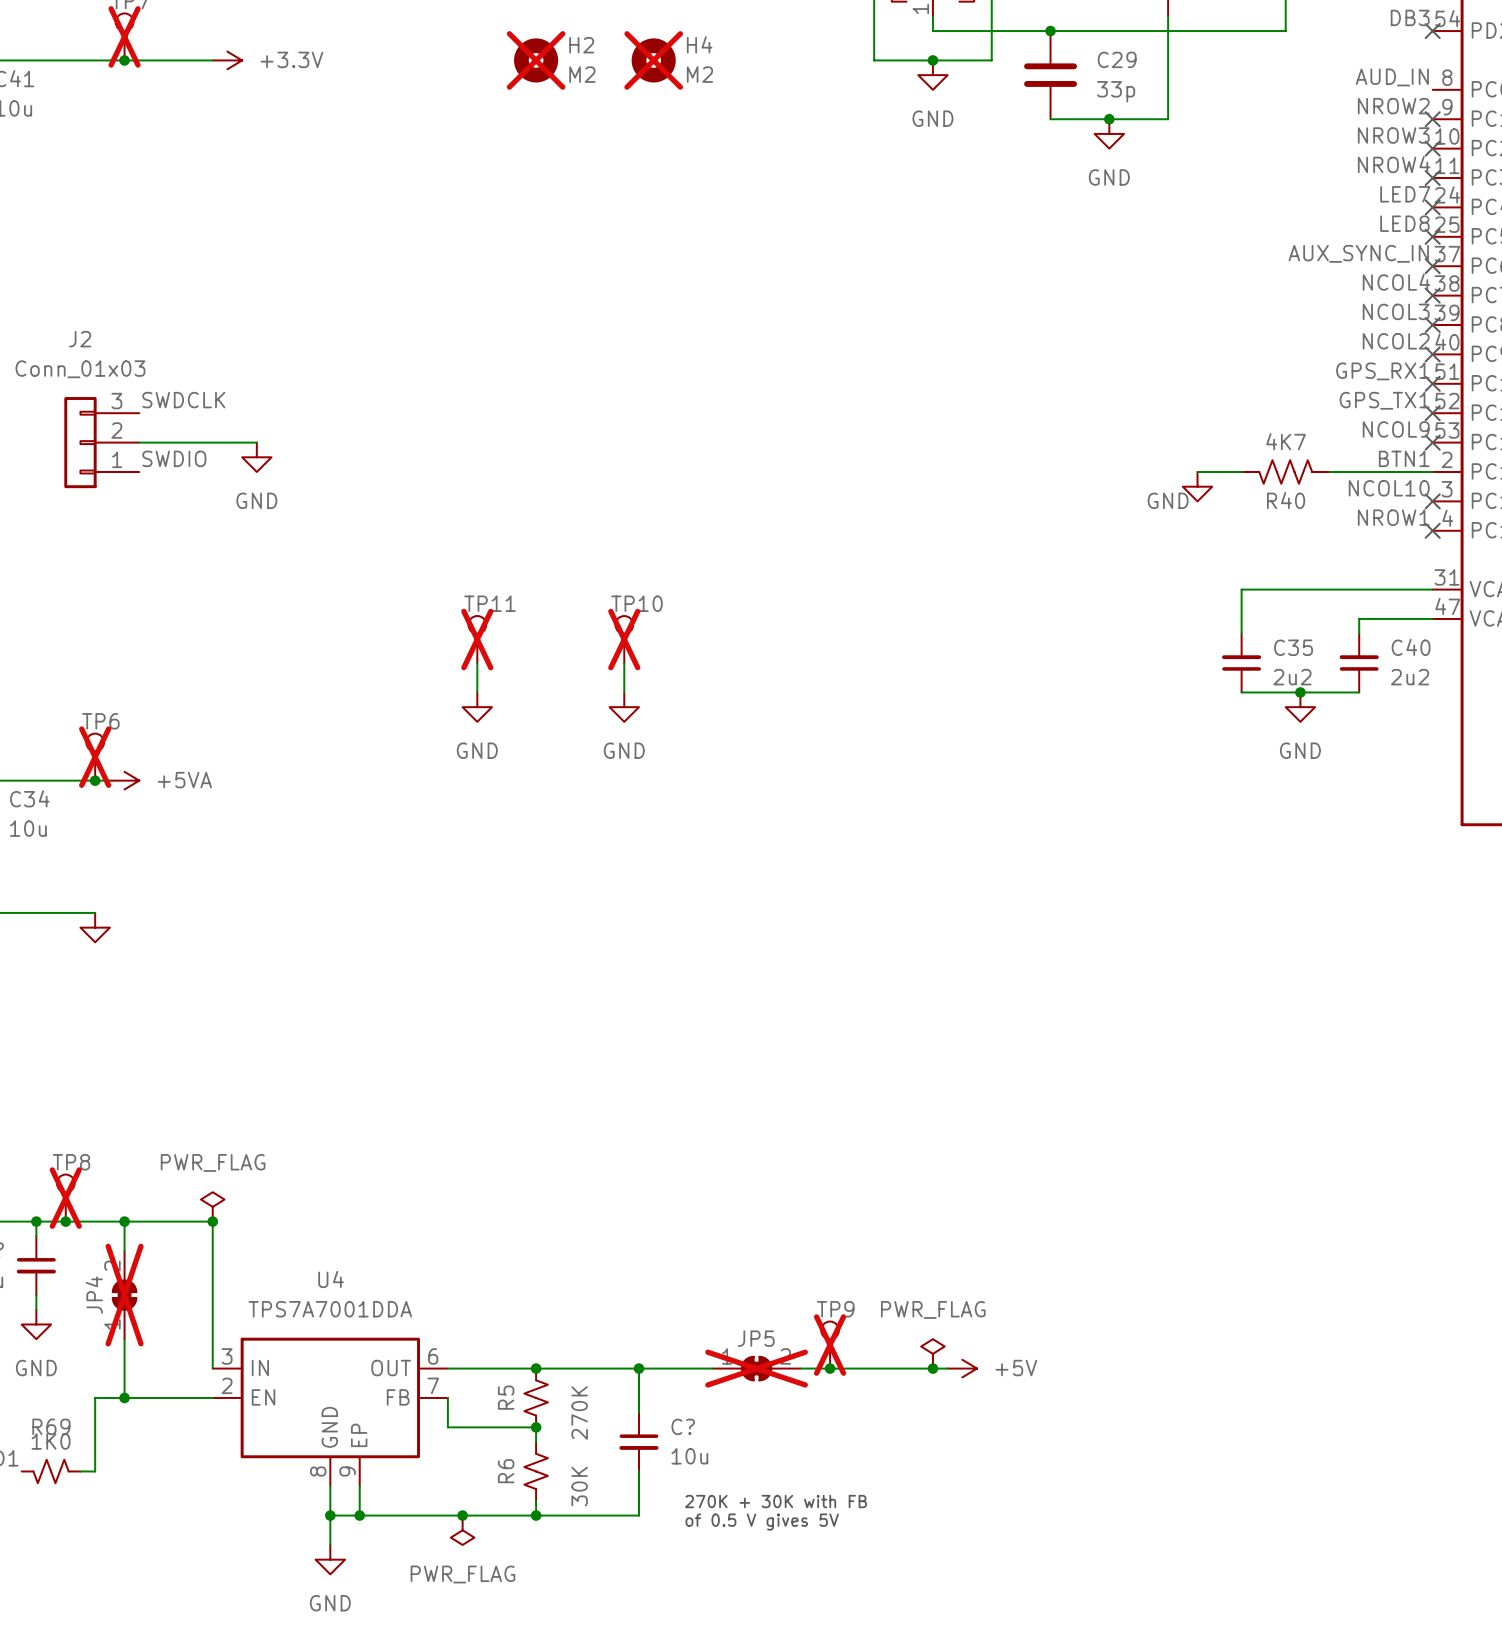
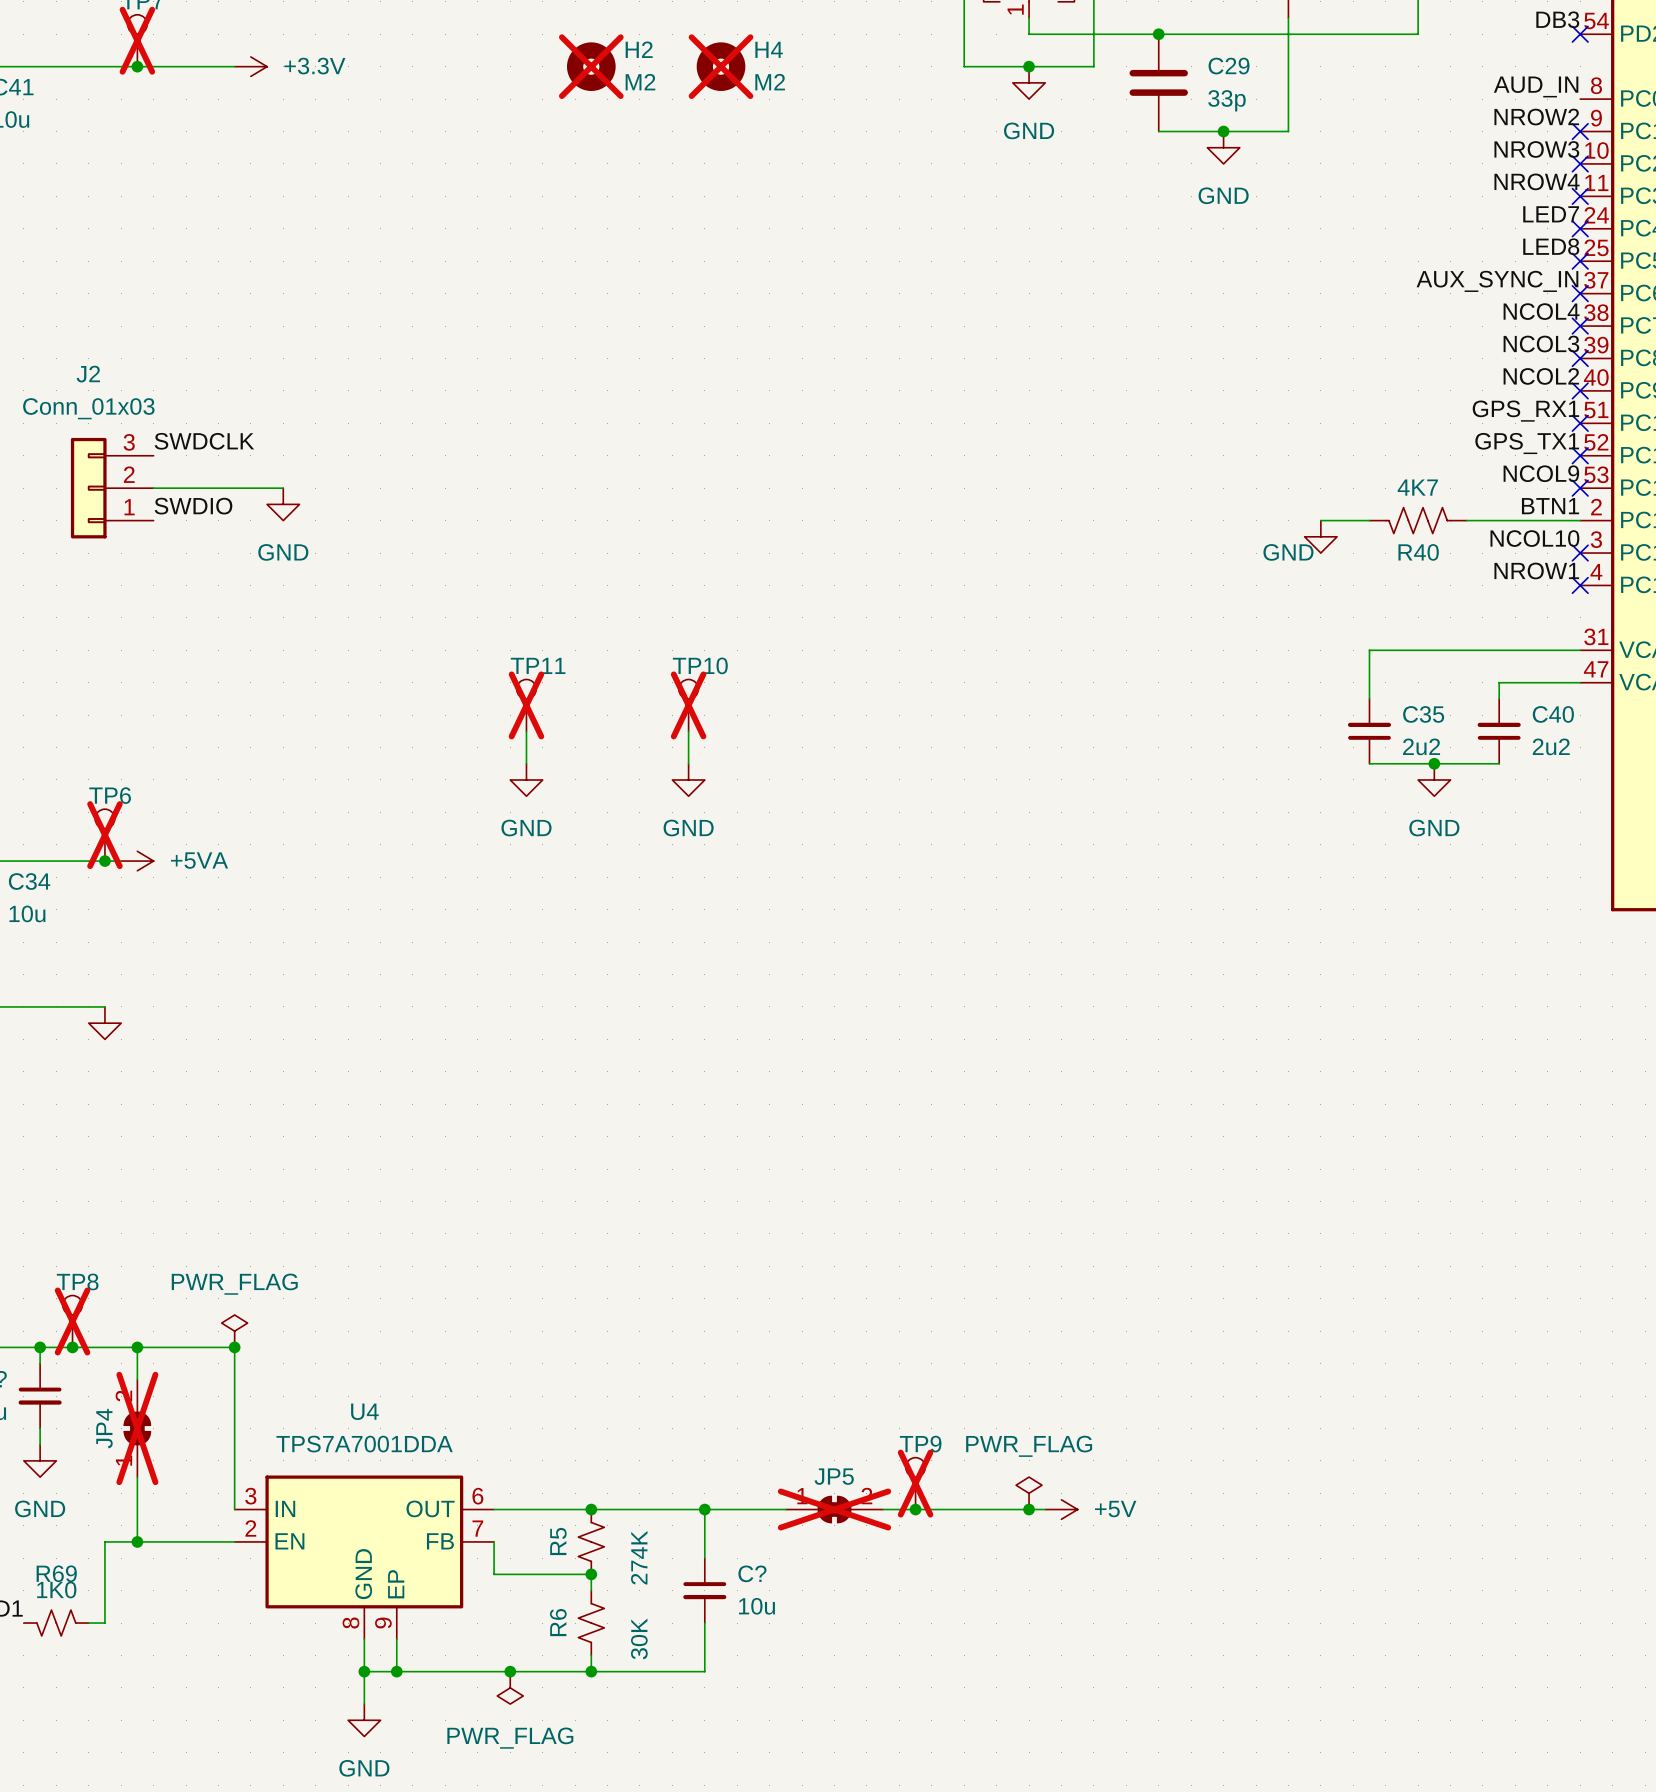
R5 value: 270K (579, 1413) -> 274K (639, 1557)
text: 270K + 30K with FB (776, 1501) -> none
text: of 0.5 V gives 5V (762, 1522) -> none

